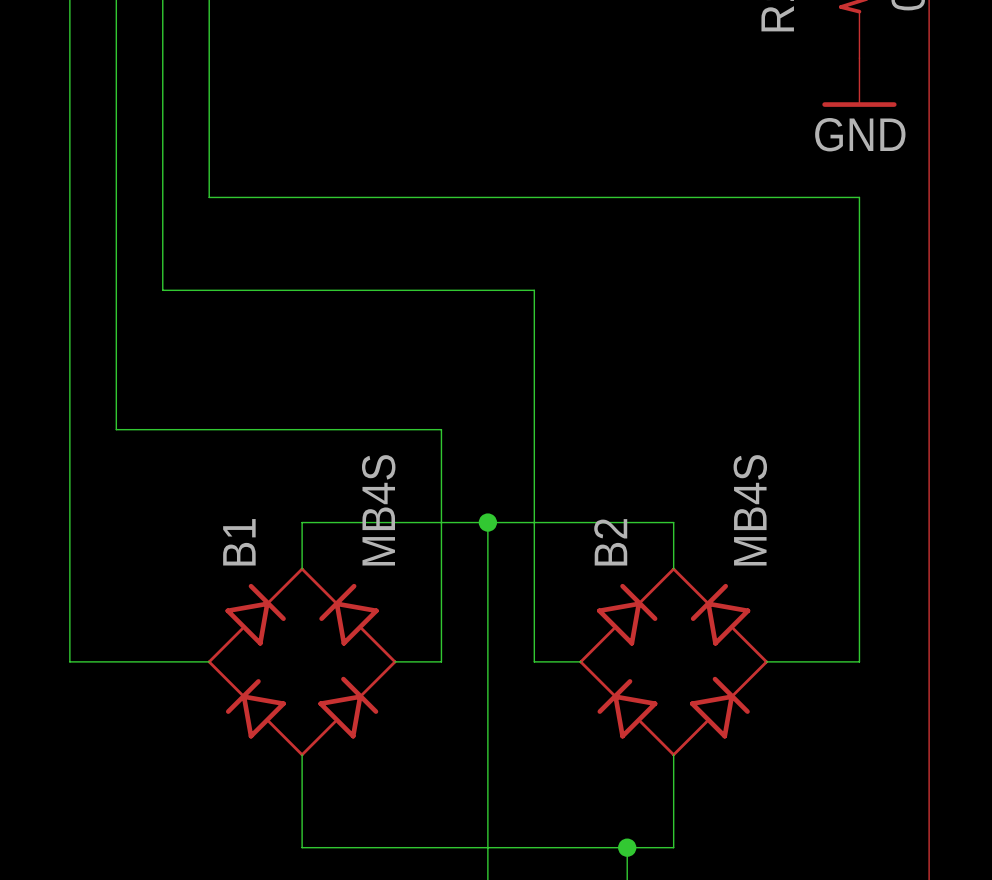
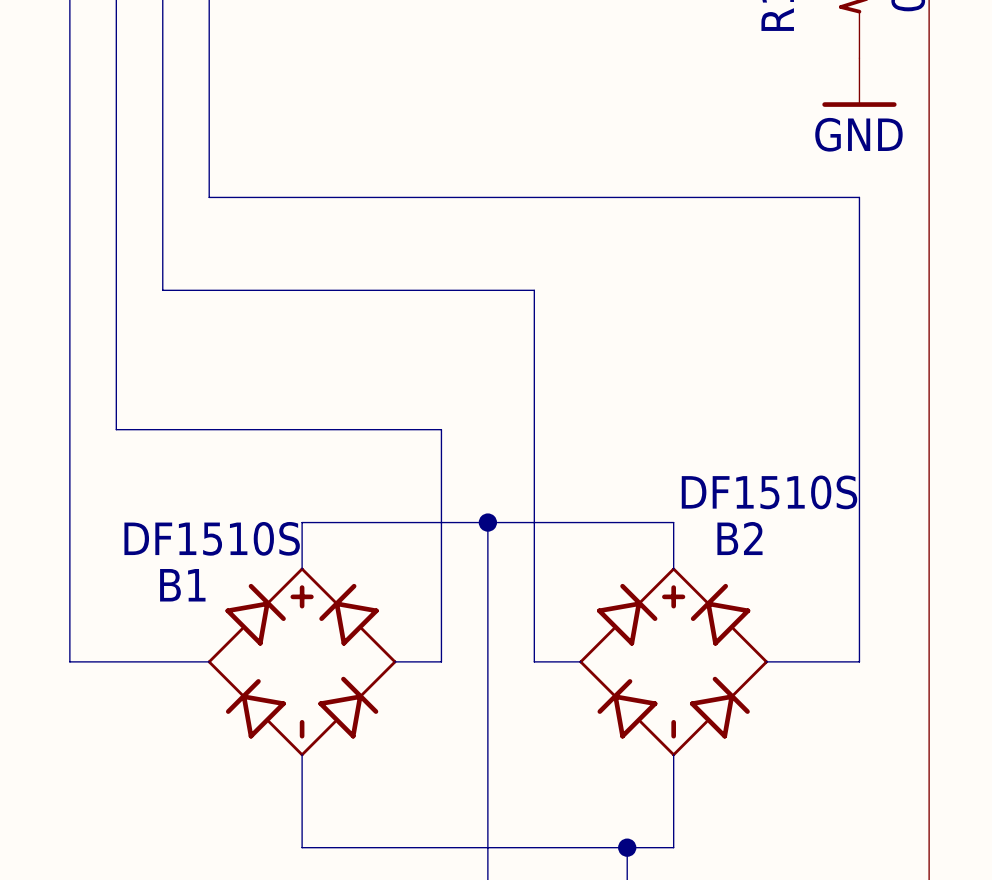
B1 value: MB4S (378, 510) -> DF1510S (212, 538)
B2 value: MB4S (750, 510) -> DF1510S (769, 492)
B1 name position: B1 (239, 542) -> B1 (182, 585)
B2 name position: B2 (610, 542) -> B2 (739, 538)
B1 symbol: [207, 567, 397, 757] -> [207, 567, 397, 757]
B2 symbol: [579, 567, 768, 757] -> [579, 567, 768, 757]

